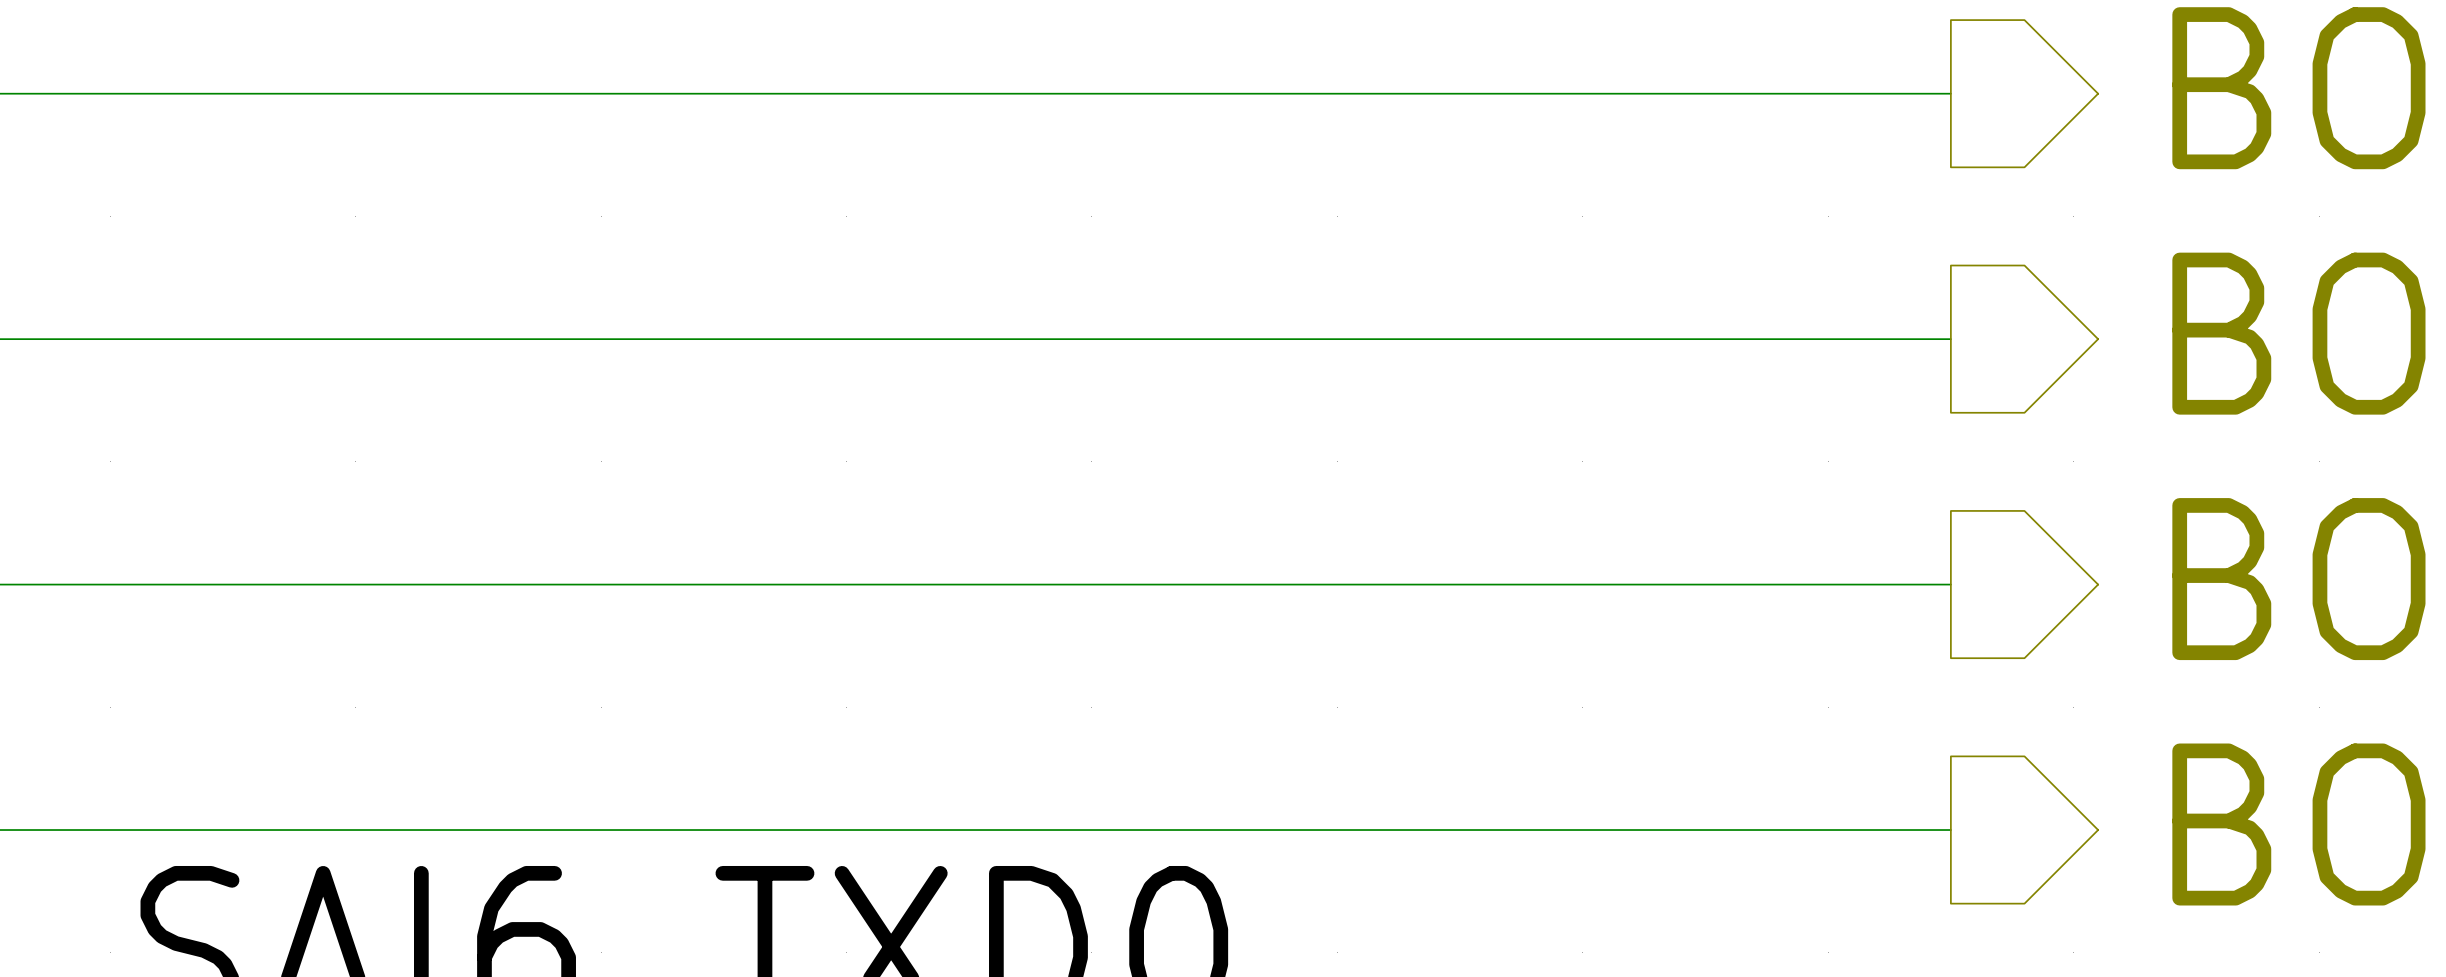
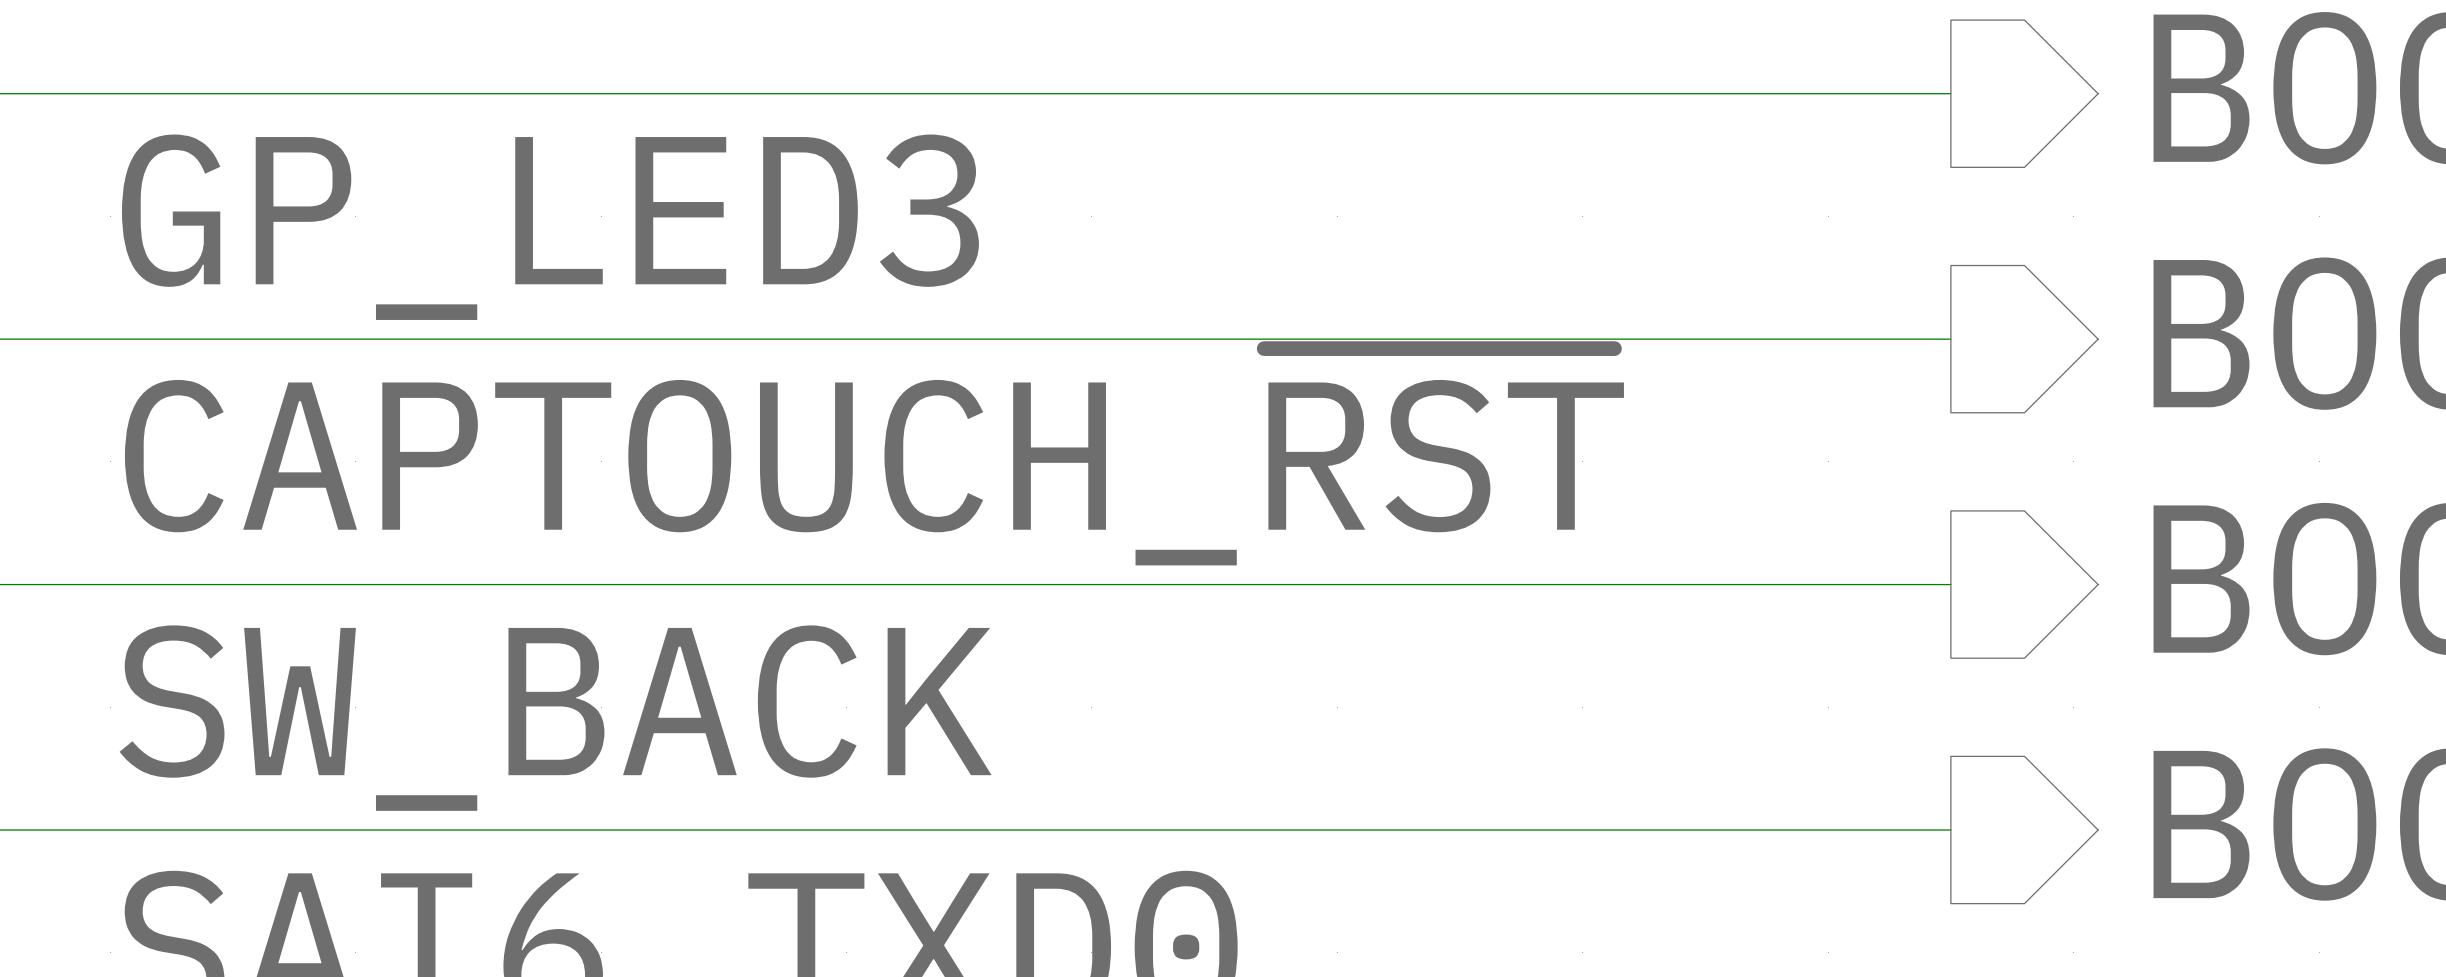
label: none -> GP_LED3 (550, 227)
label: none -> CAPTOUCH_~{RST} (874, 457)
label: none -> SW_BACK (555, 718)

